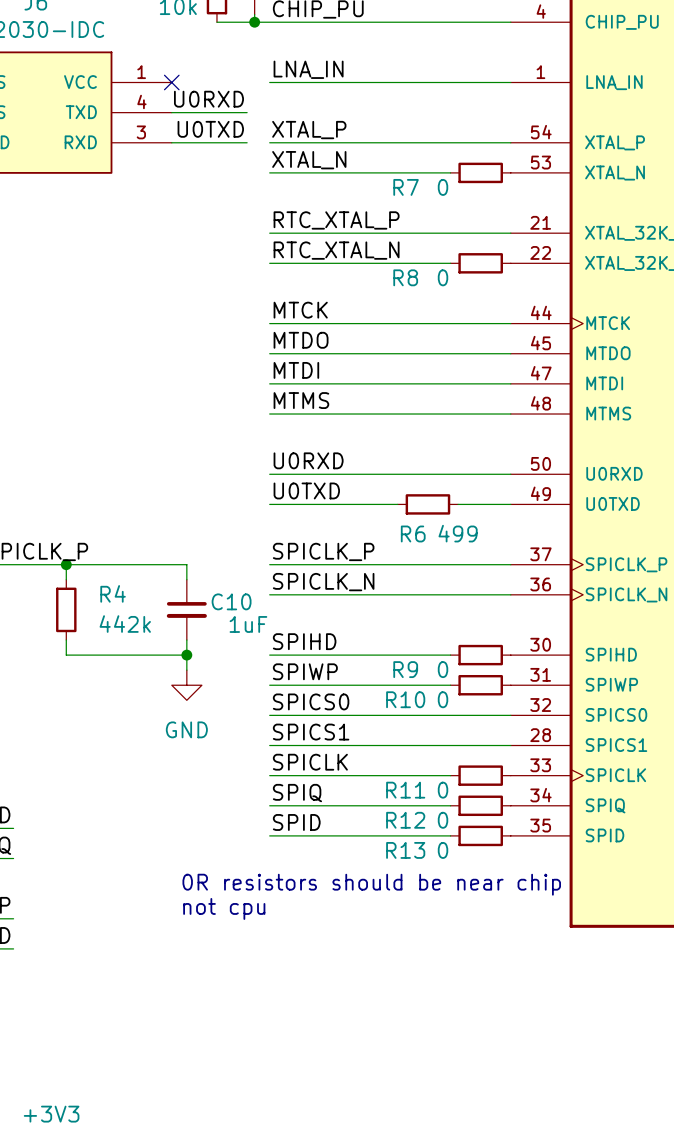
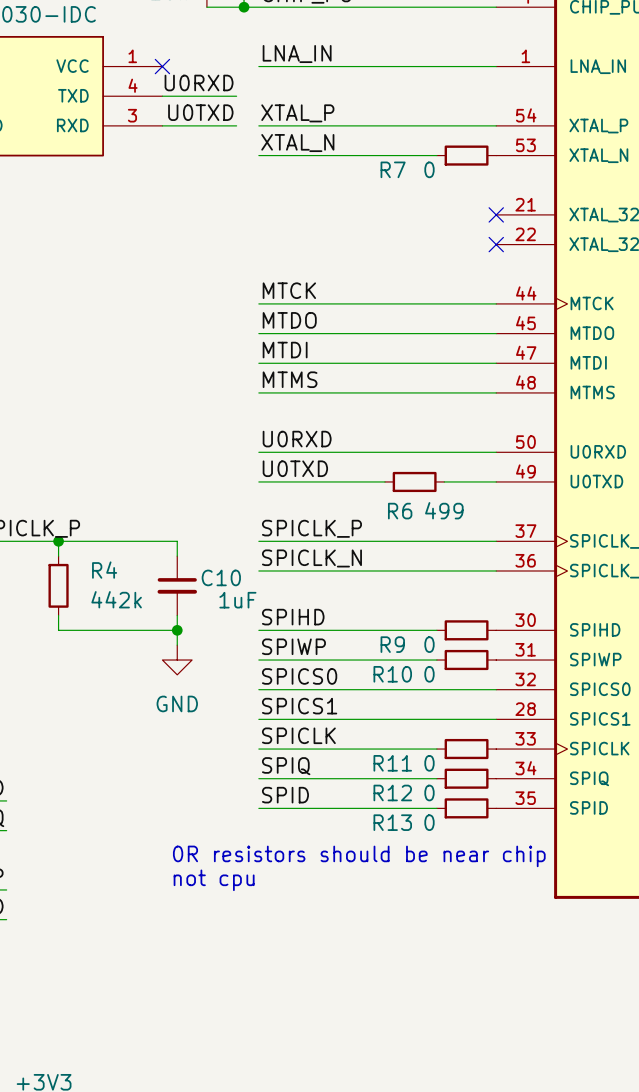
label: RTC_XTAL_P (336, 220) -> none
wire: (269, 233) (510, 233) -> none
no-connect mark: none -> (496, 214)
label: RTC_XTAL_N (336, 250) -> none
wire: (269, 263) (450, 263) -> none
R8: 0 (480, 263) -> none
no-connect mark: none -> (496, 244)

